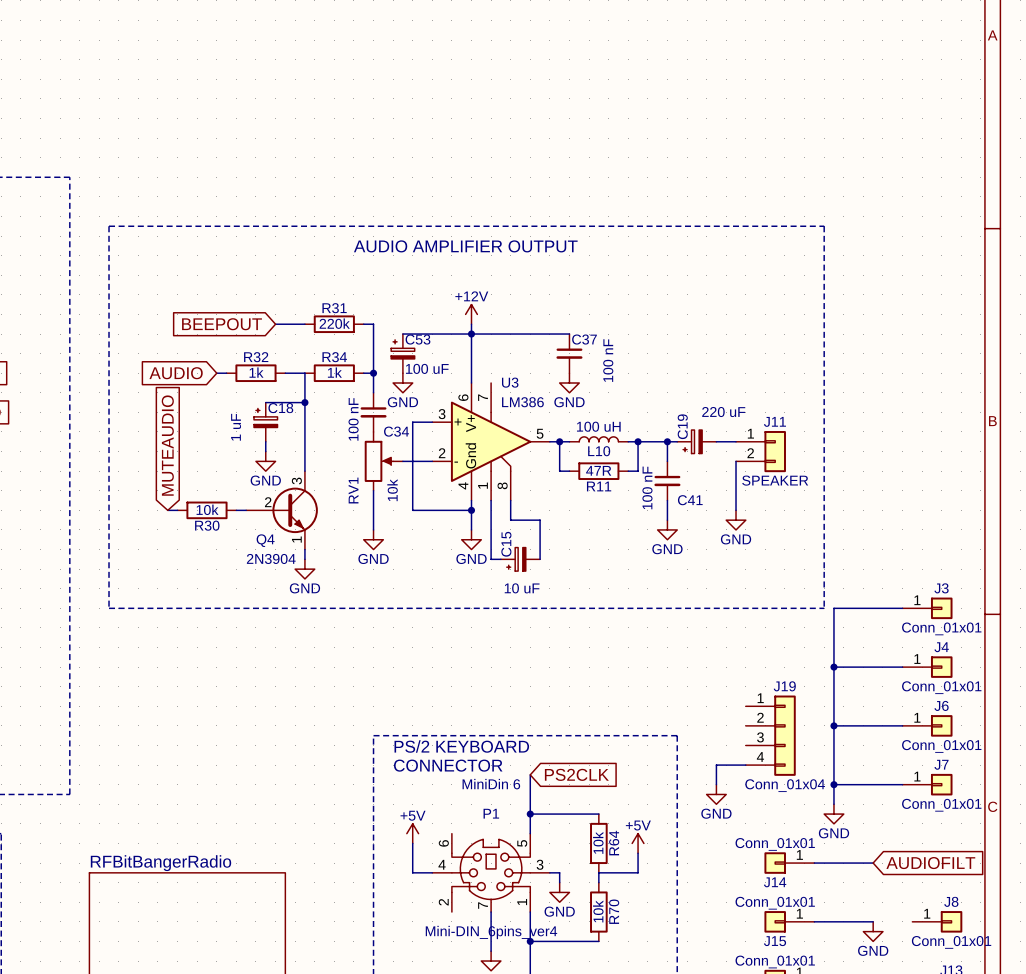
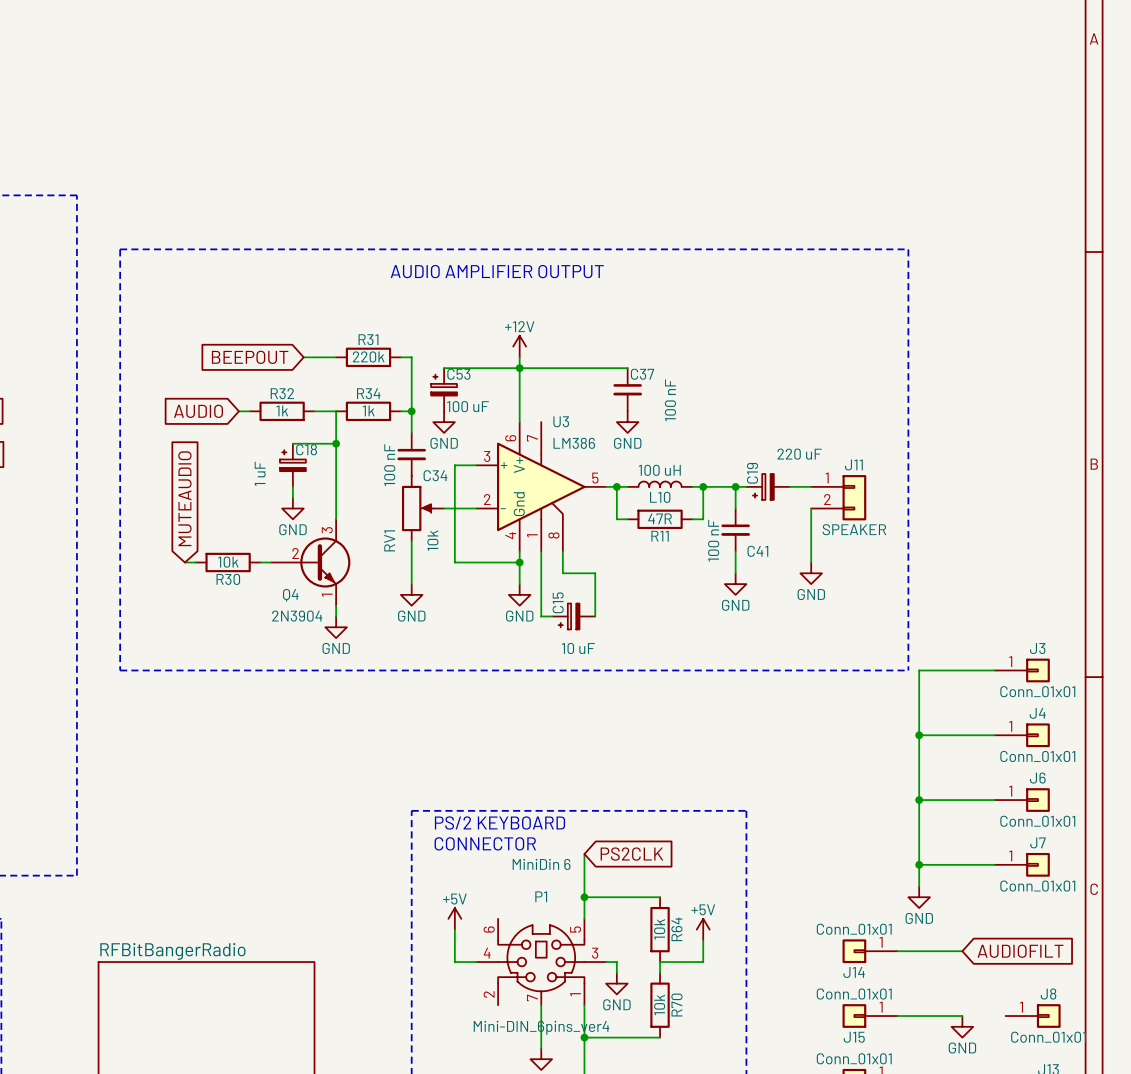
J19: Conn_01x04 (770, 735) -> none
wire: (745, 765) (716, 765) (716, 784) -> none
power symbol: GND (716, 794) -> none

